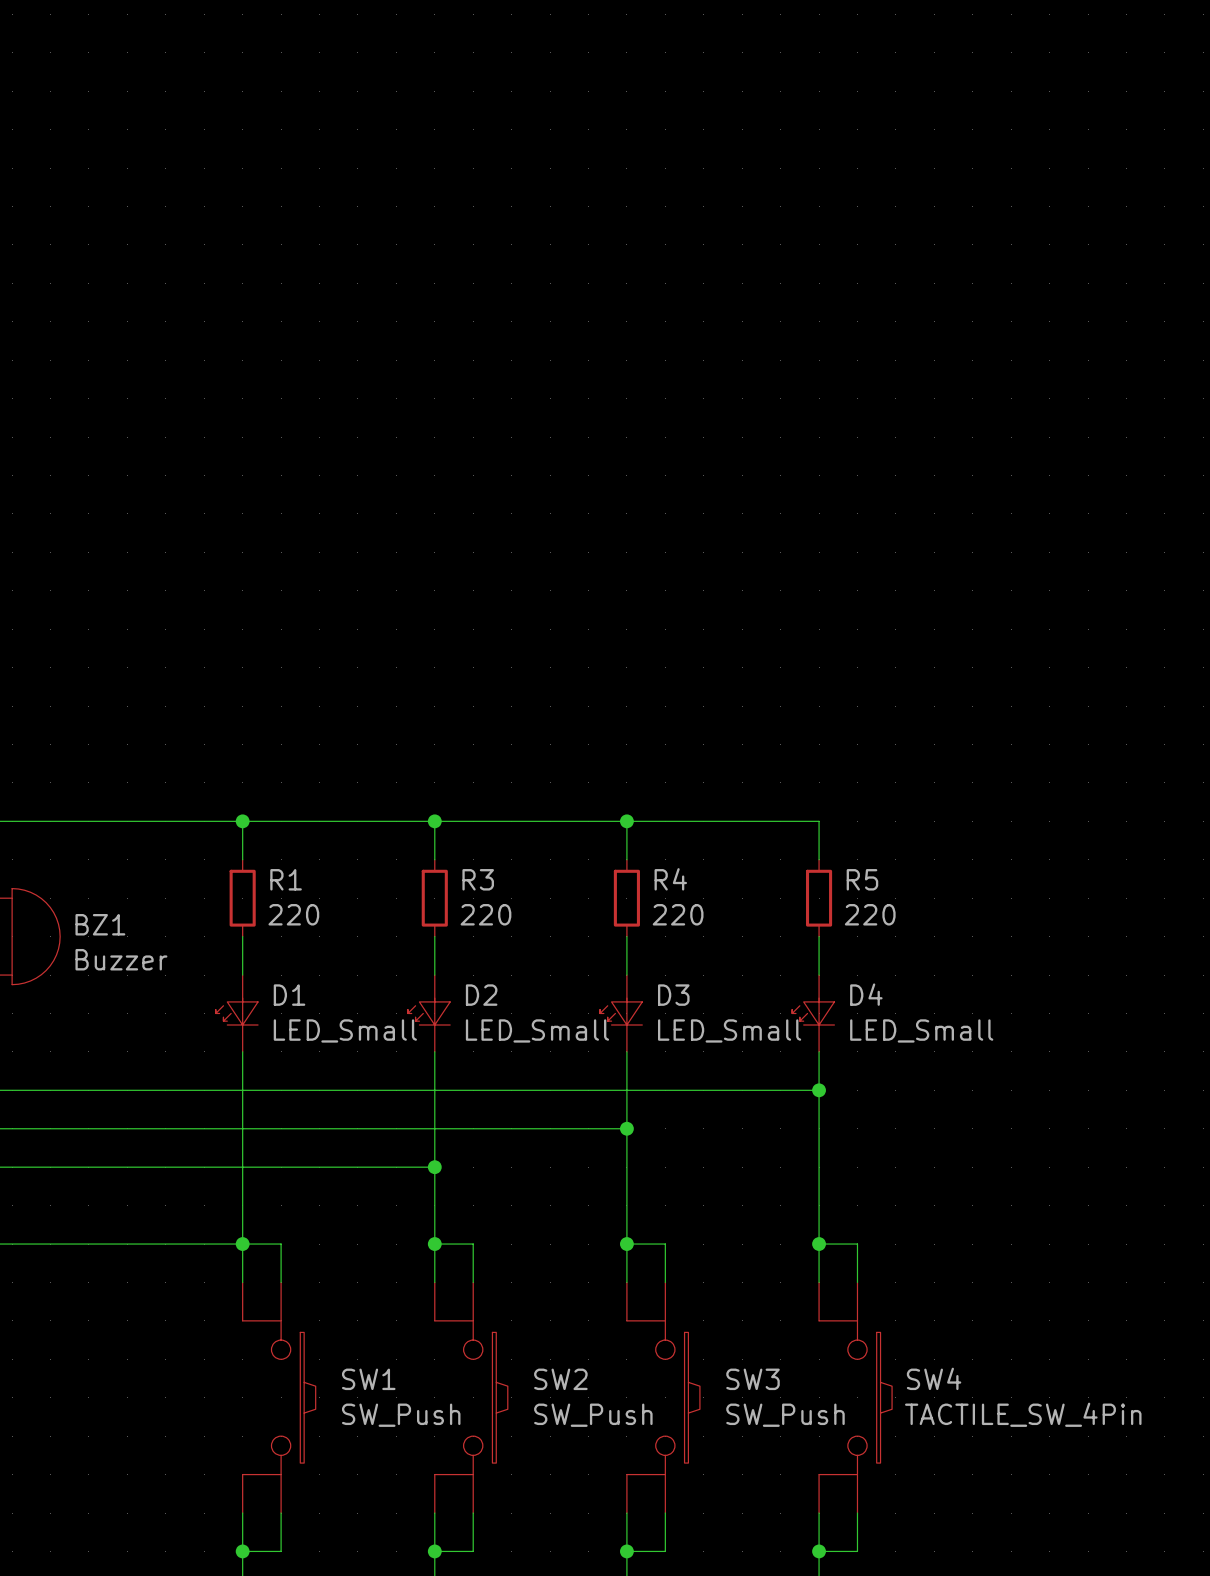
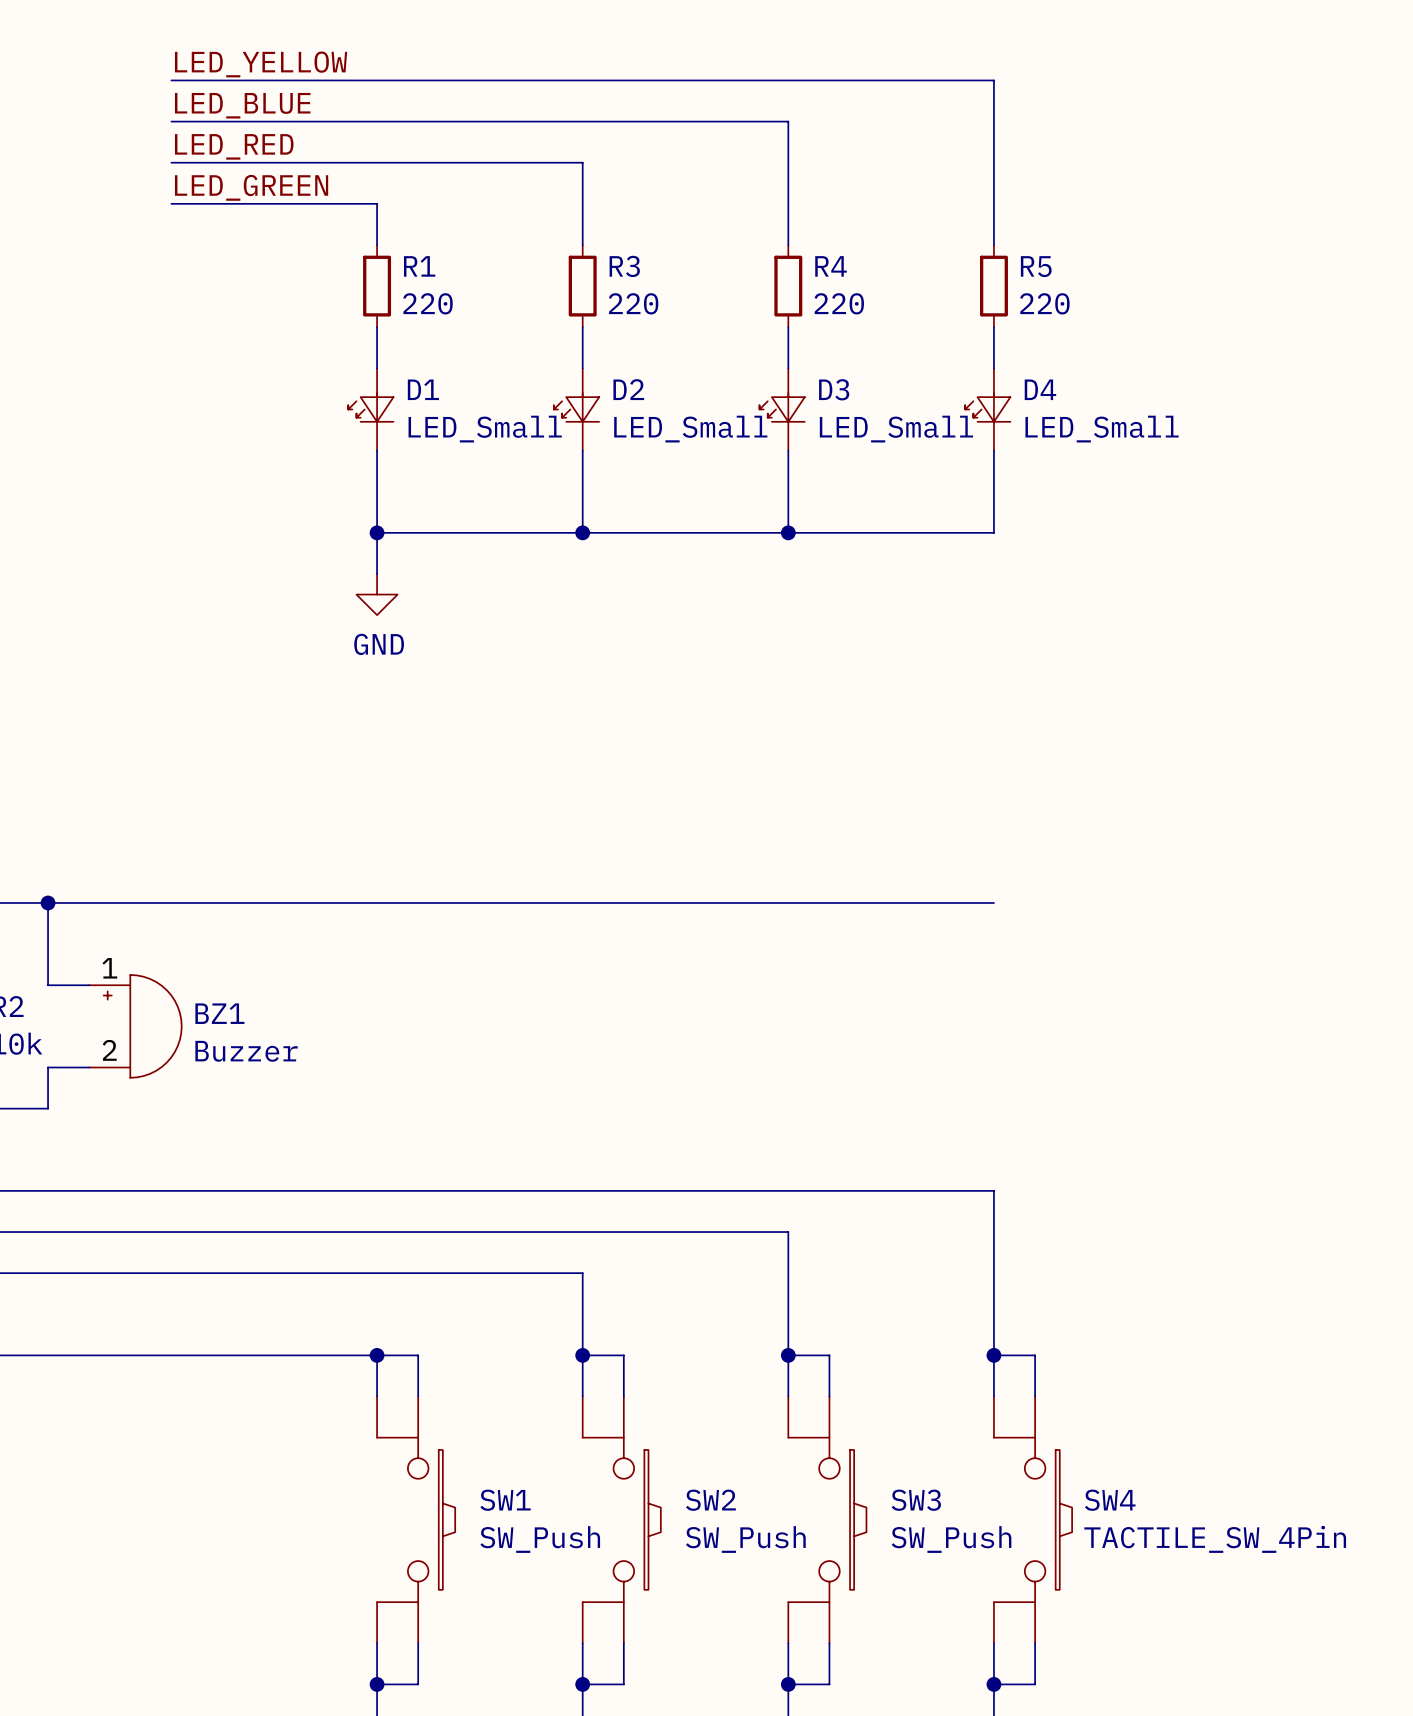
label: none -> LED_YELLOW (261, 64)
wire: none -> (171, 80) (993, 80) (993, 244)
label: none -> LED_BLUE (242, 105)
wire: none -> (171, 121) (788, 121) (788, 244)
label: none -> LED_RED (234, 146)
wire: none -> (171, 162) (582, 162) (582, 244)
label: none -> LED_GREEN (251, 187)
wire: none -> (171, 203) (377, 203) (377, 244)
wire: none -> (377, 327) (377, 368)
wire: none -> (582, 327) (582, 368)
wire: none -> (788, 327) (788, 368)
wire: none -> (993, 327) (993, 368)
wire: none -> (377, 450) (377, 573)
wire: none -> (582, 450) (582, 532)
wire: none -> (788, 450) (788, 532)
wire: none -> (993, 450) (993, 532) (377, 532)
junction: none -> (377, 532)
junction: none -> (582, 532)
junction: none -> (788, 532)
power symbol: none -> GND (377, 594)
wire: (242, 821) (242, 859) -> none
junction: (242, 821) -> none
wire: (434, 821) (434, 859) -> none
junction: (434, 821) -> none
wire: (626, 821) (626, 859) -> none
junction: (626, 821) -> none
wire: (819, 821) (819, 859) -> none
R1 position: (242, 898) -> (377, 286)
R3 position: (434, 898) -> (582, 286)
R4 position: (626, 898) -> (788, 286)
R5 position: (819, 898) -> (993, 286)
wire: (242, 936) (242, 975) -> none
wire: (434, 936) (434, 975) -> none
wire: (626, 936) (626, 975) -> none
wire: (819, 936) (819, 975) -> none
D1 position: (236, 1013) -> (370, 409)
D2 position: (429, 1013) -> (576, 409)
D3 position: (621, 1013) -> (782, 409)
D4 position: (813, 1013) -> (987, 409)
wire: (242, 1051) (242, 1244) -> none
wire: (434, 1051) (434, 1167) -> none
wire: (626, 1051) (626, 1128) -> none
wire: (819, 1051) (819, 1090) -> none
junction: (819, 1090) -> none
junction: (626, 1128) -> none
junction: (434, 1167) -> none

